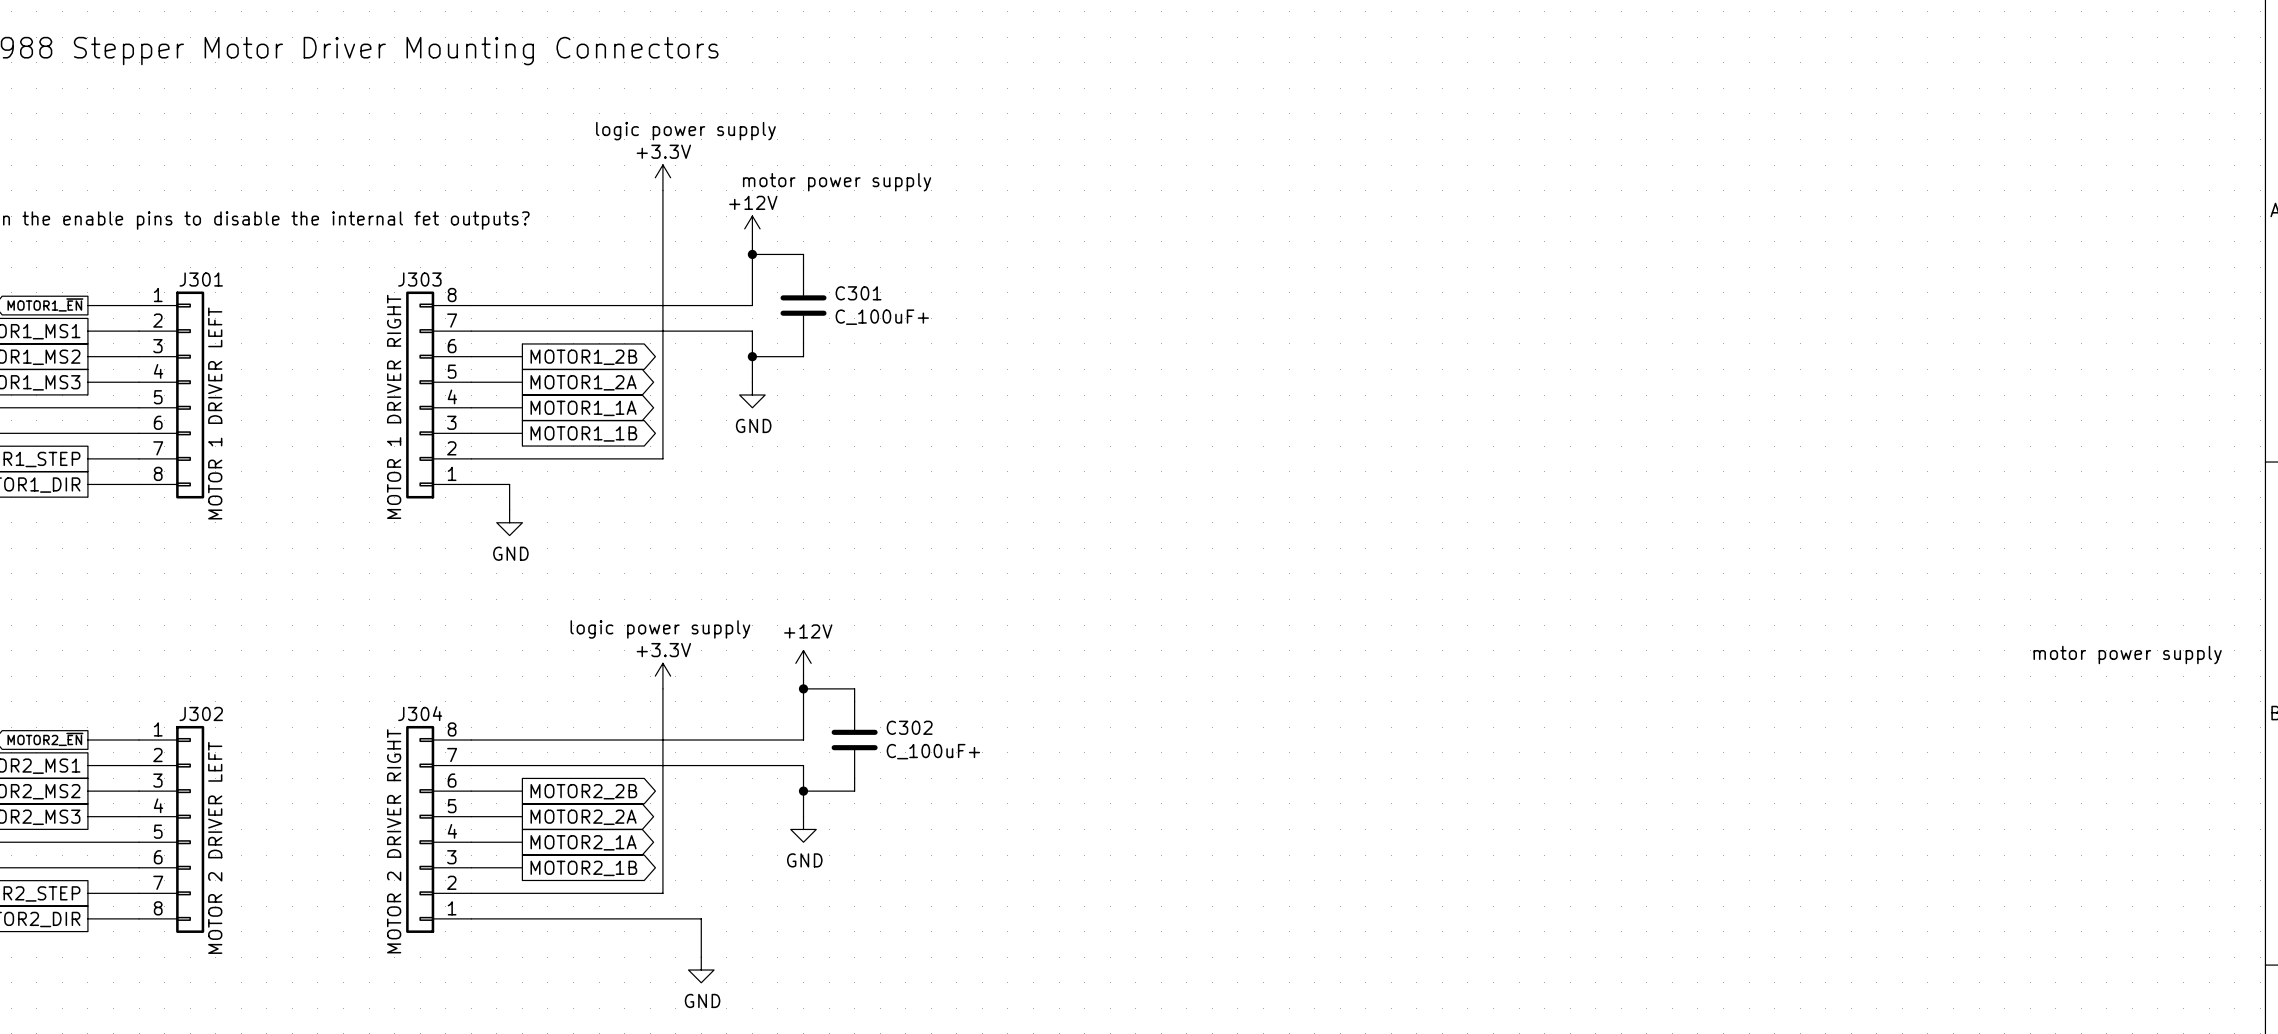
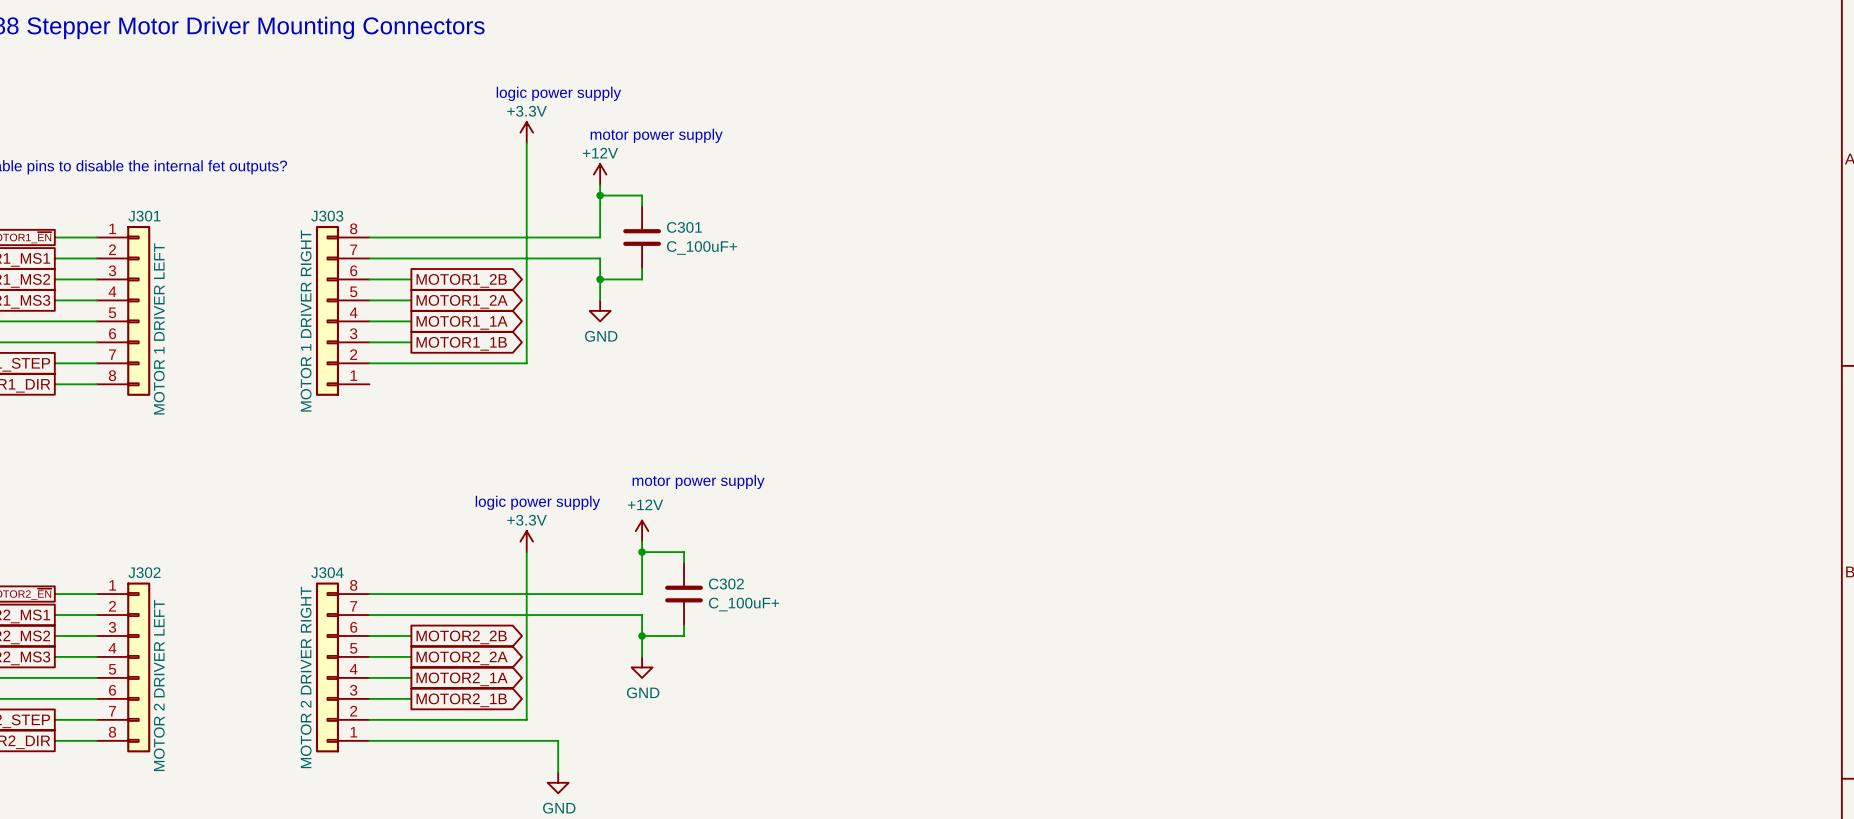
wire: (471, 484) (509, 484) (509, 510) -> none
power symbol: GND (509, 522) -> none
text: none -> motor power supply (698, 481)
text: motor power supply (2127, 655) -> none

